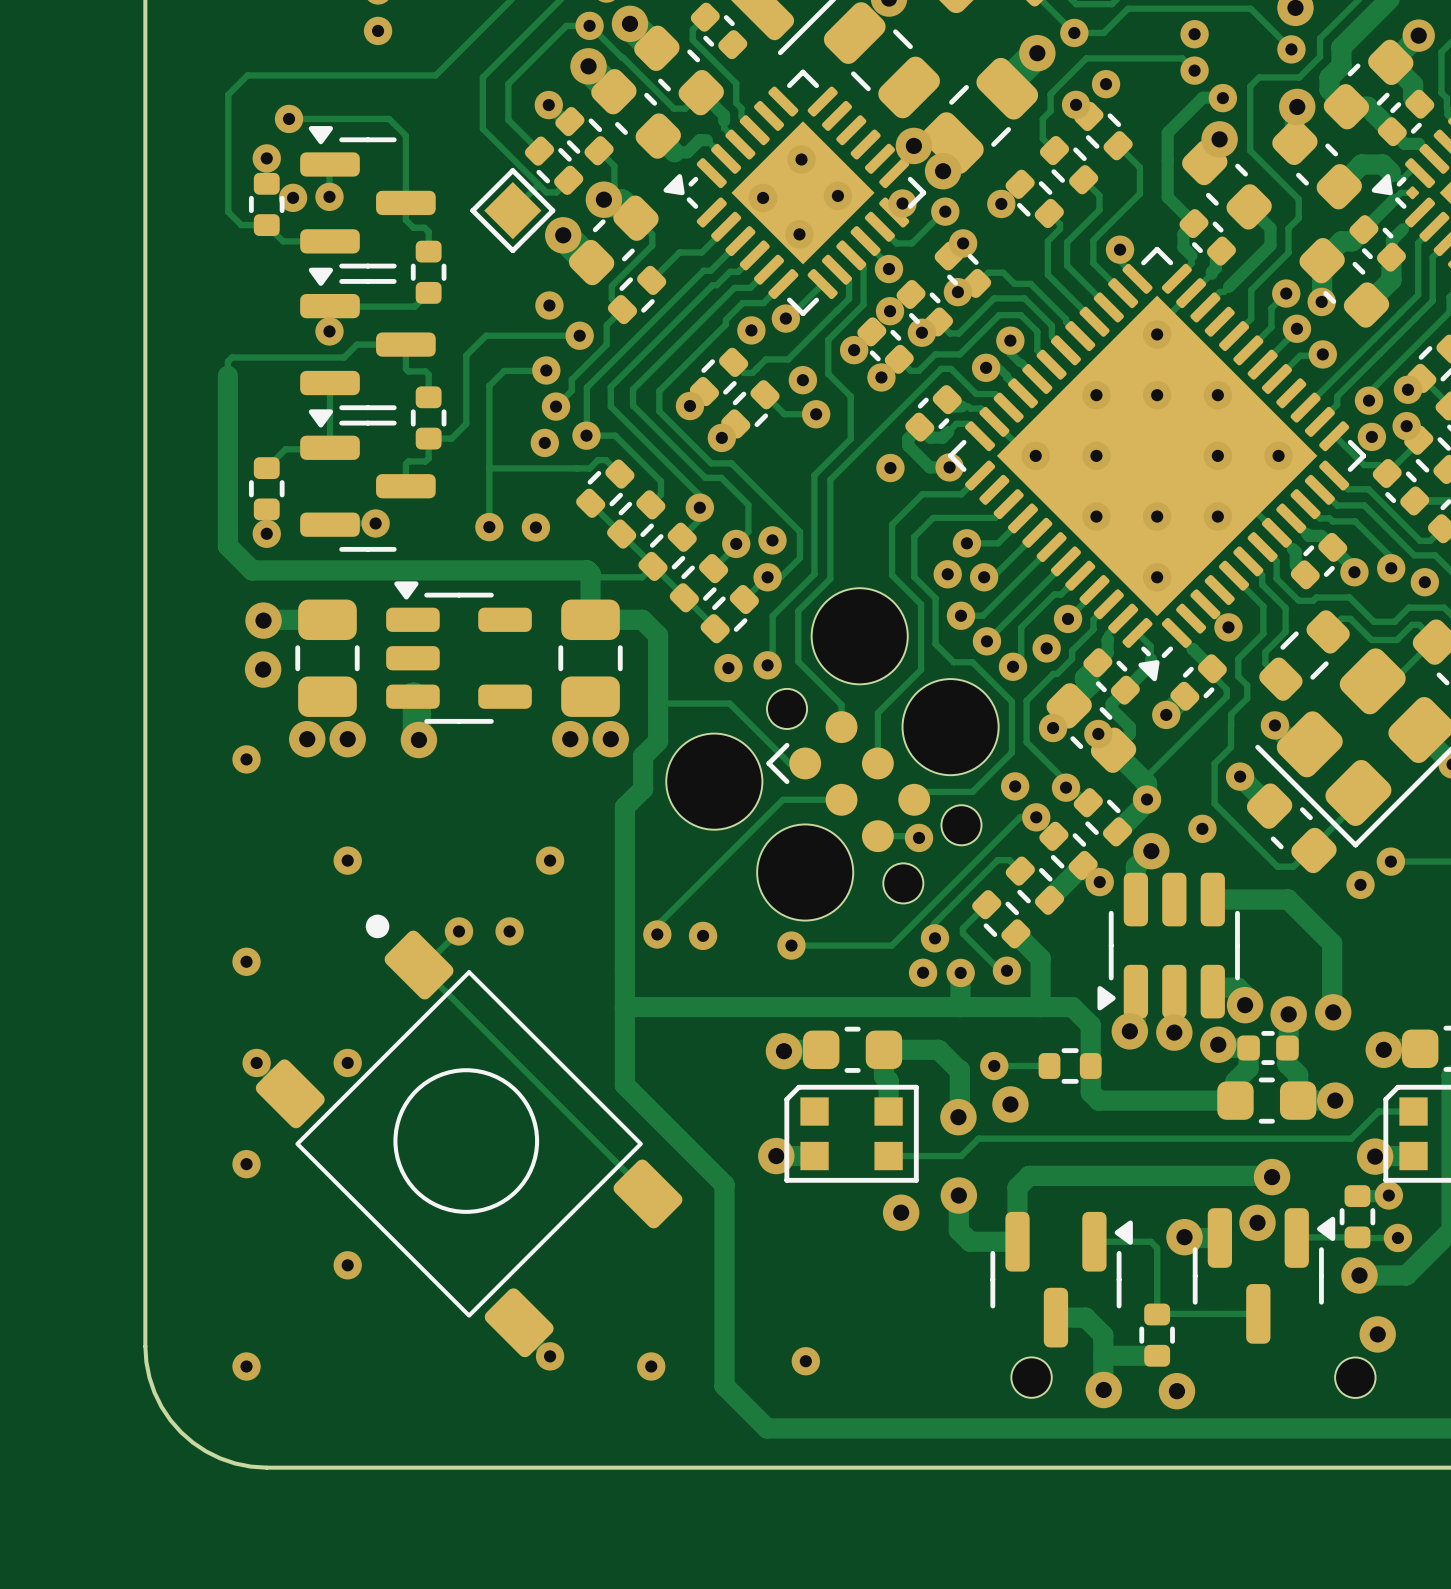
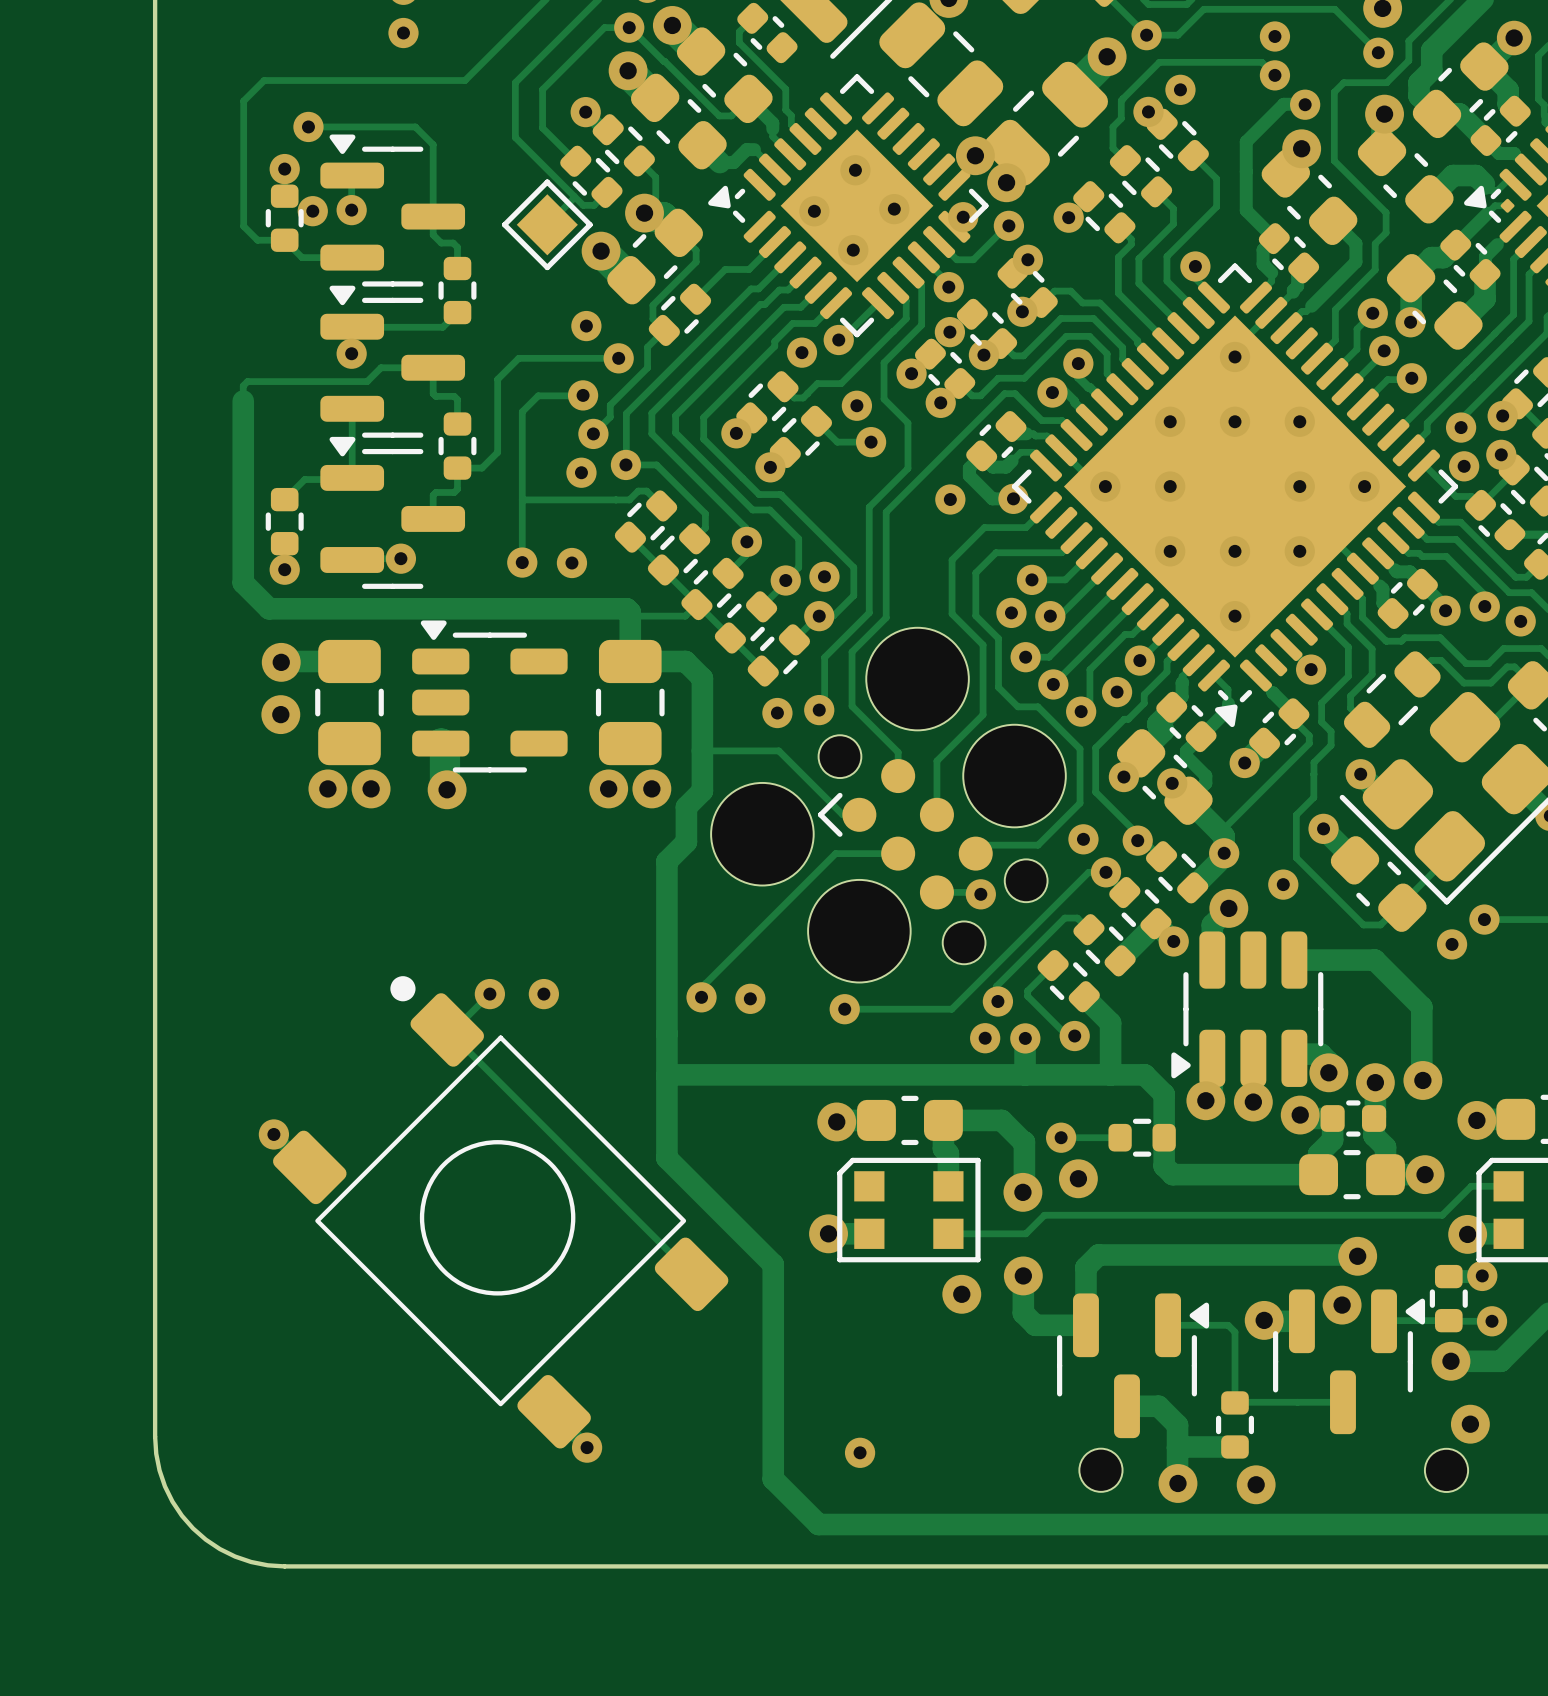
via: (246, 759) -> none
via: (347, 860) -> none
via: (550, 860) -> none
via: (246, 961) -> none
via: (347, 1062) -> none
via: (246, 1164) -> none
via: (347, 1265) -> none
via: (246, 1366) -> none
via: (651, 1366) -> none

